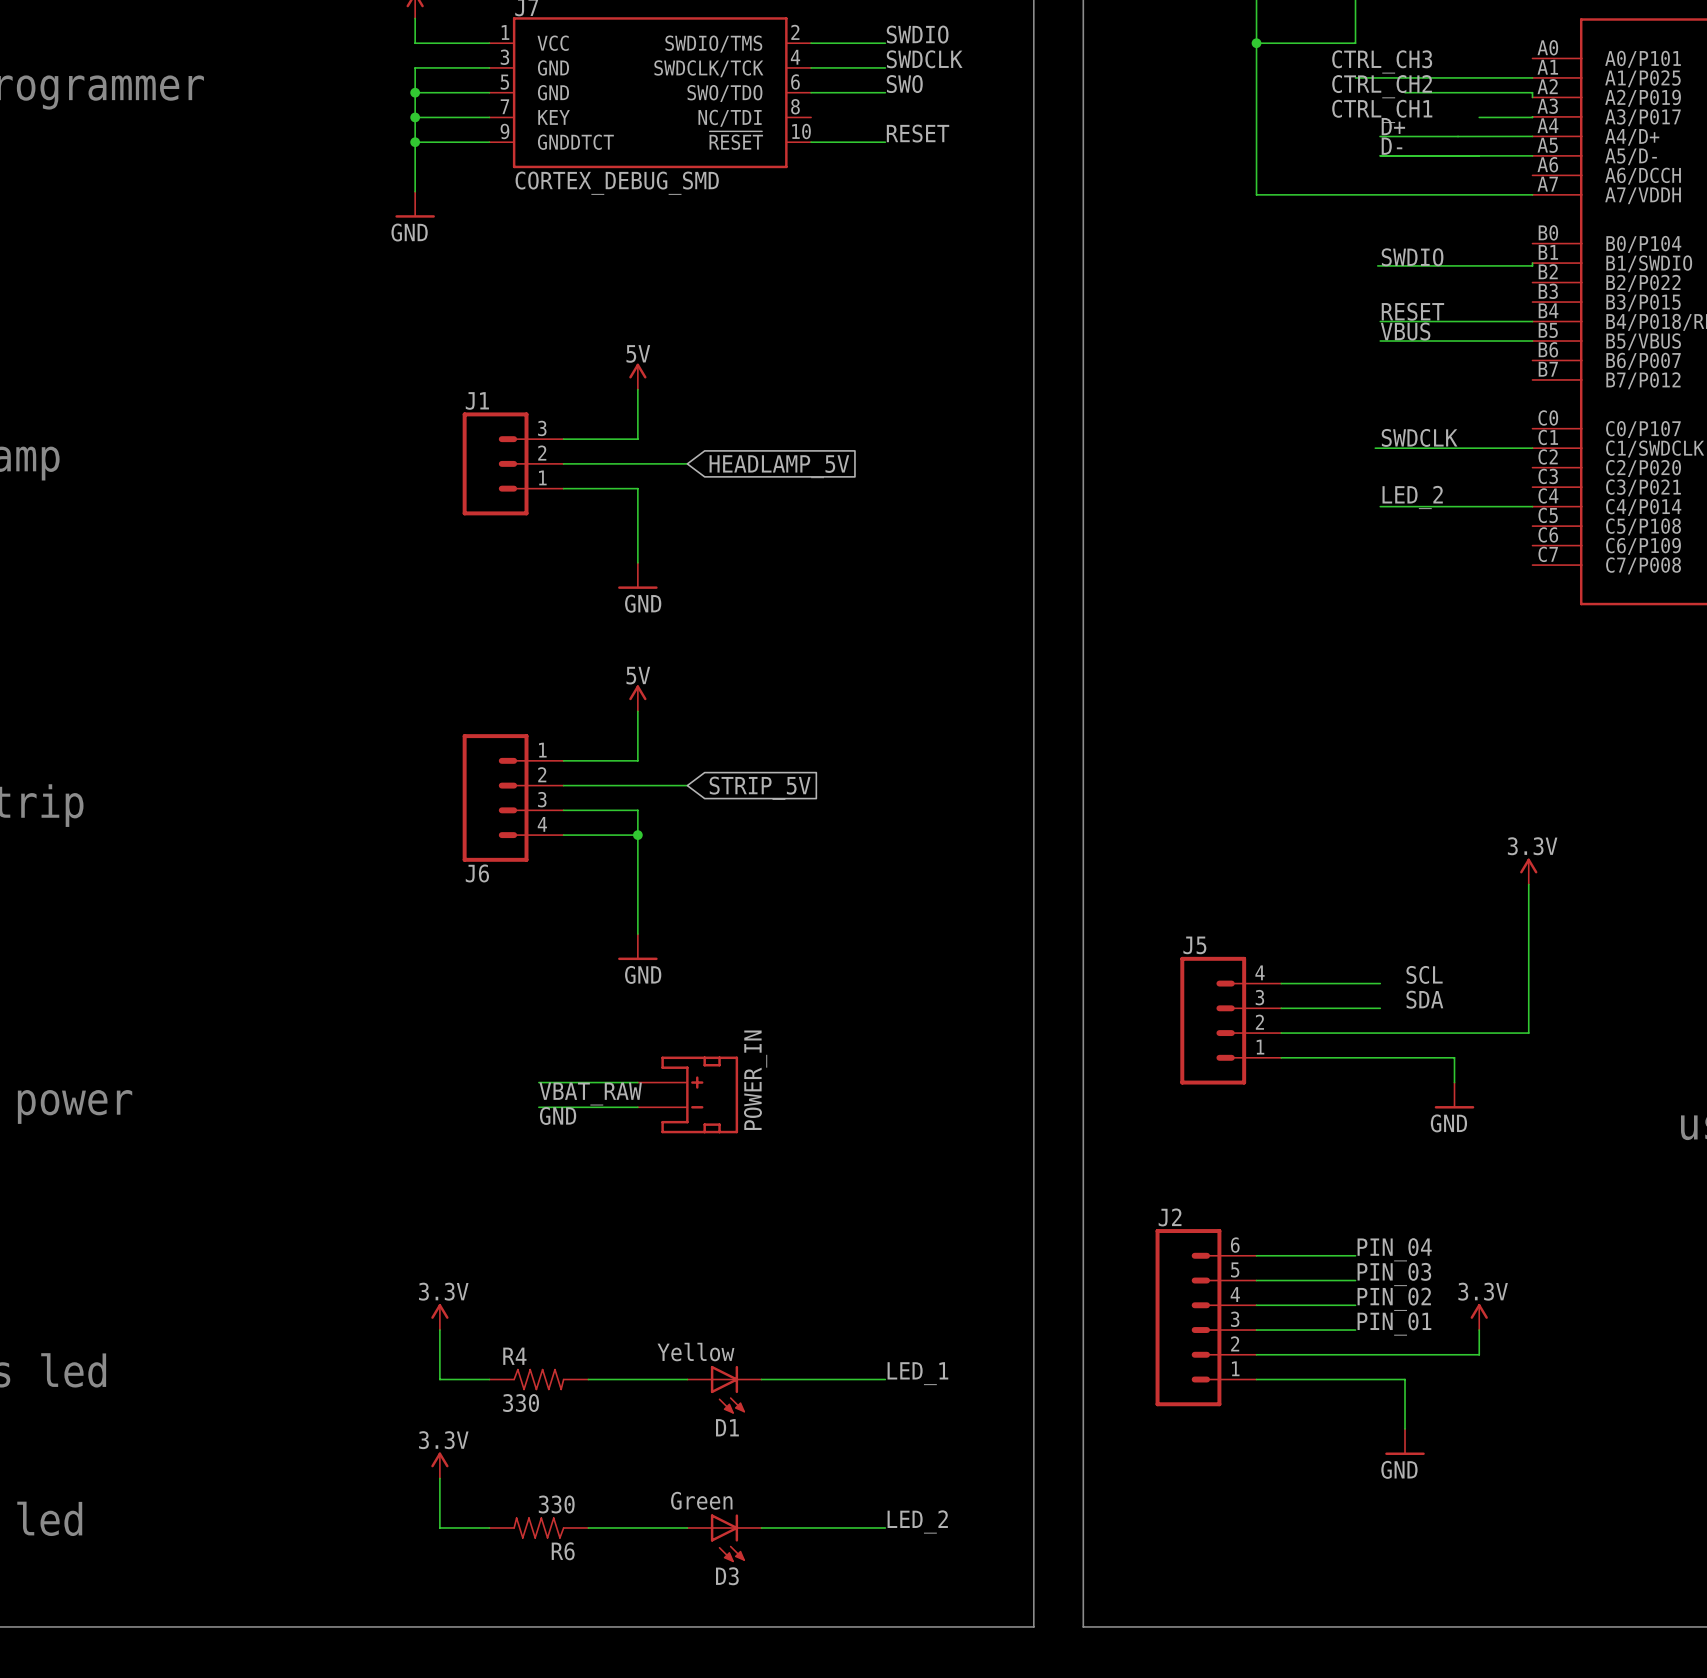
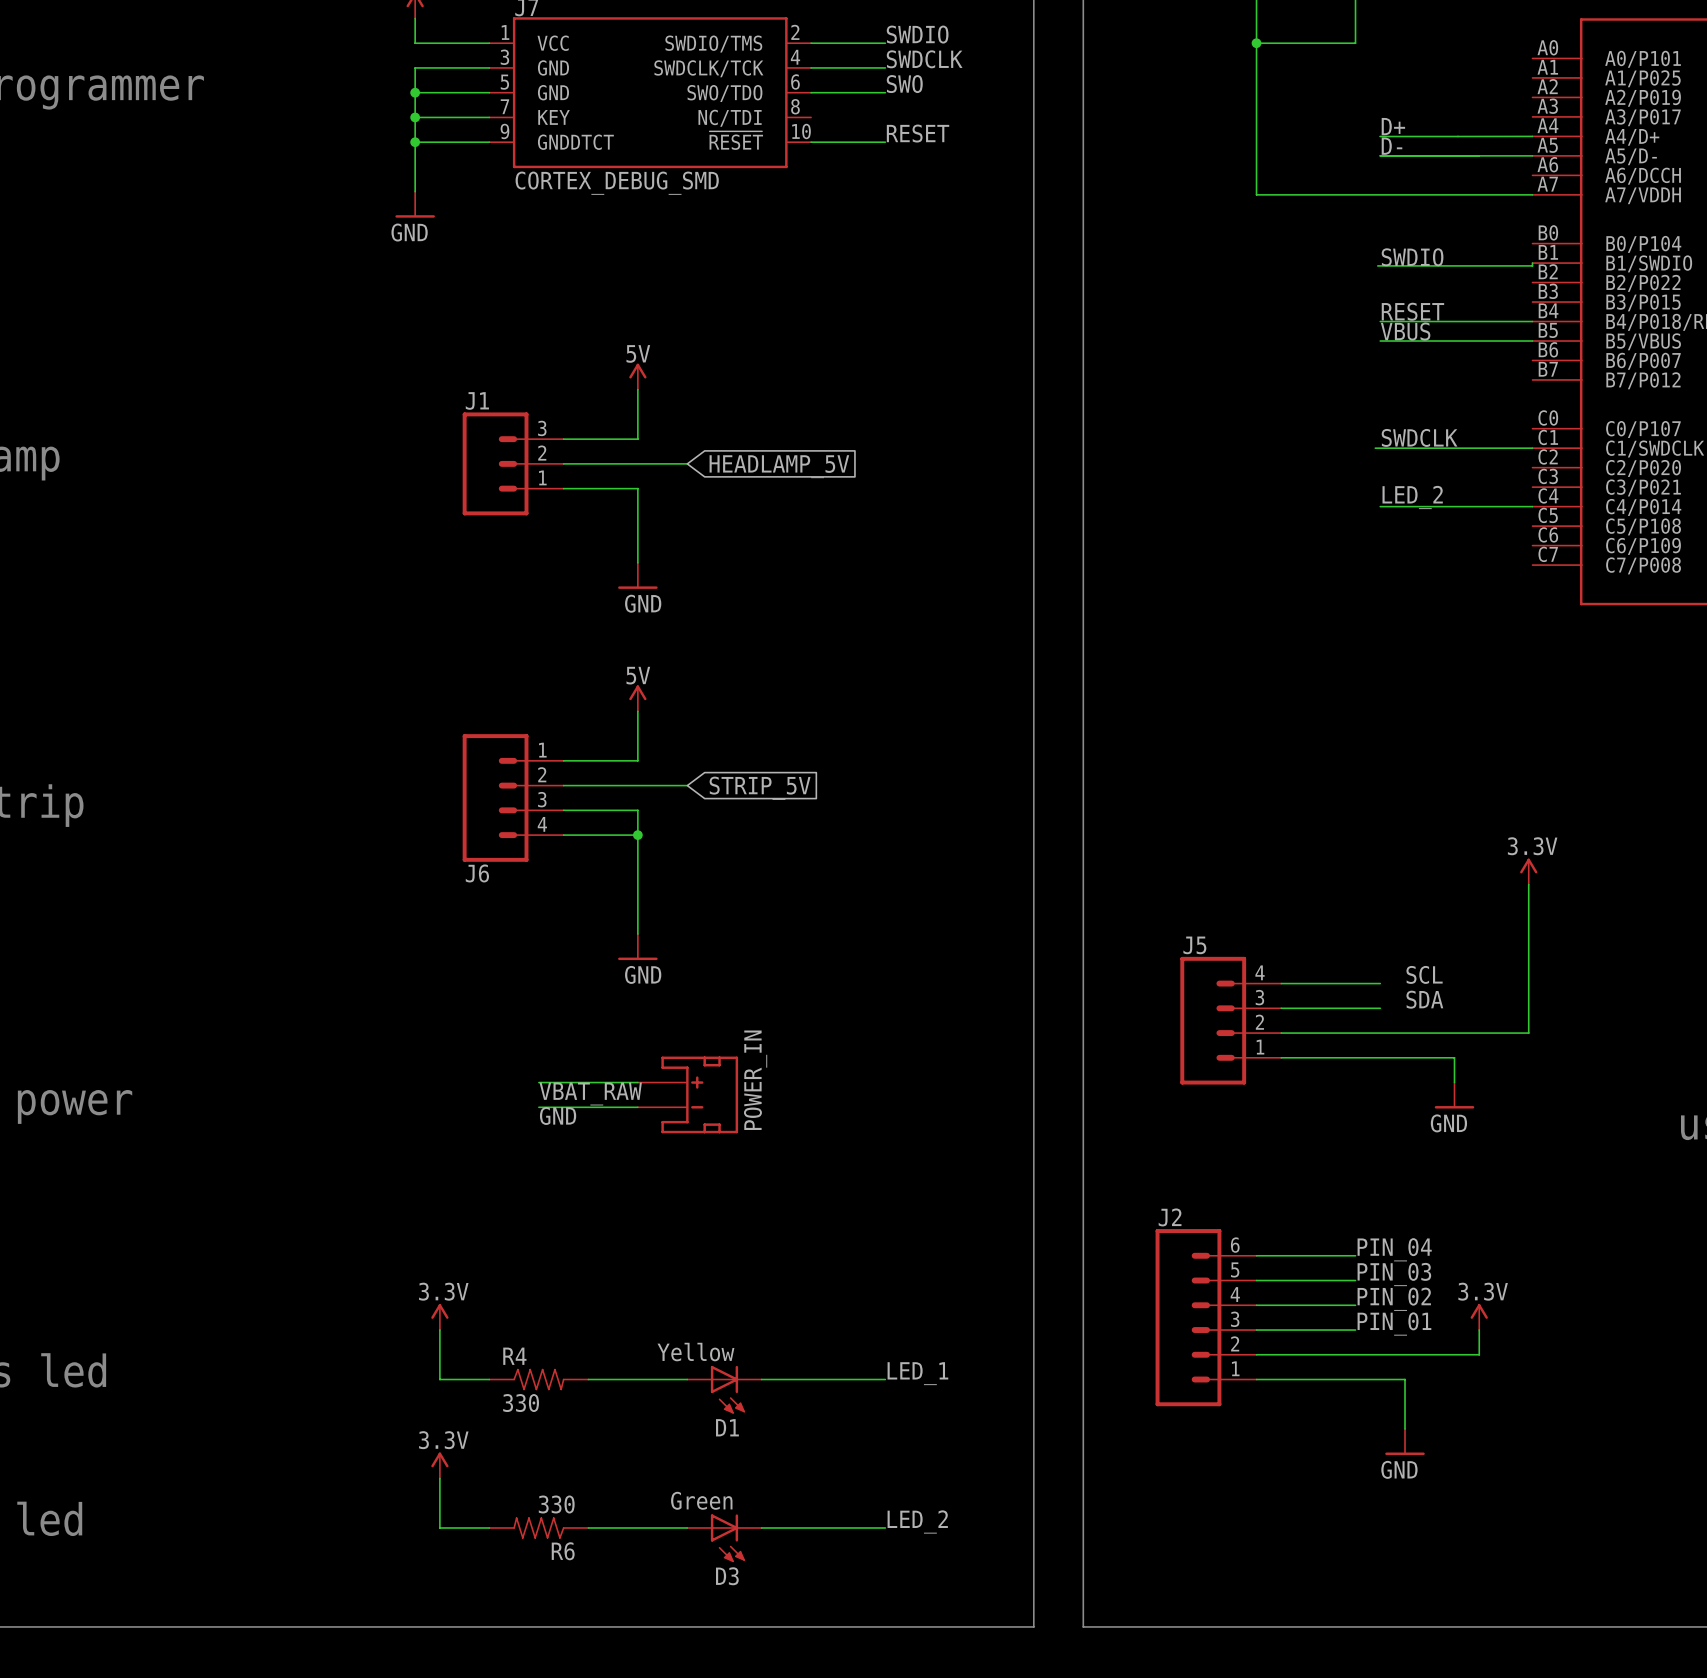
label: CTRL_CH3 (1382, 61) -> none
wire: (1355, 77) (1532, 77) -> none
label: CTRL_CH2 (1382, 86) -> none
wire: (1405, 92) (1532, 92) (1532, 97) -> none
label: CTRL_CH1 (1382, 111) -> none
wire: (1532, 116) (1479, 117) -> none

